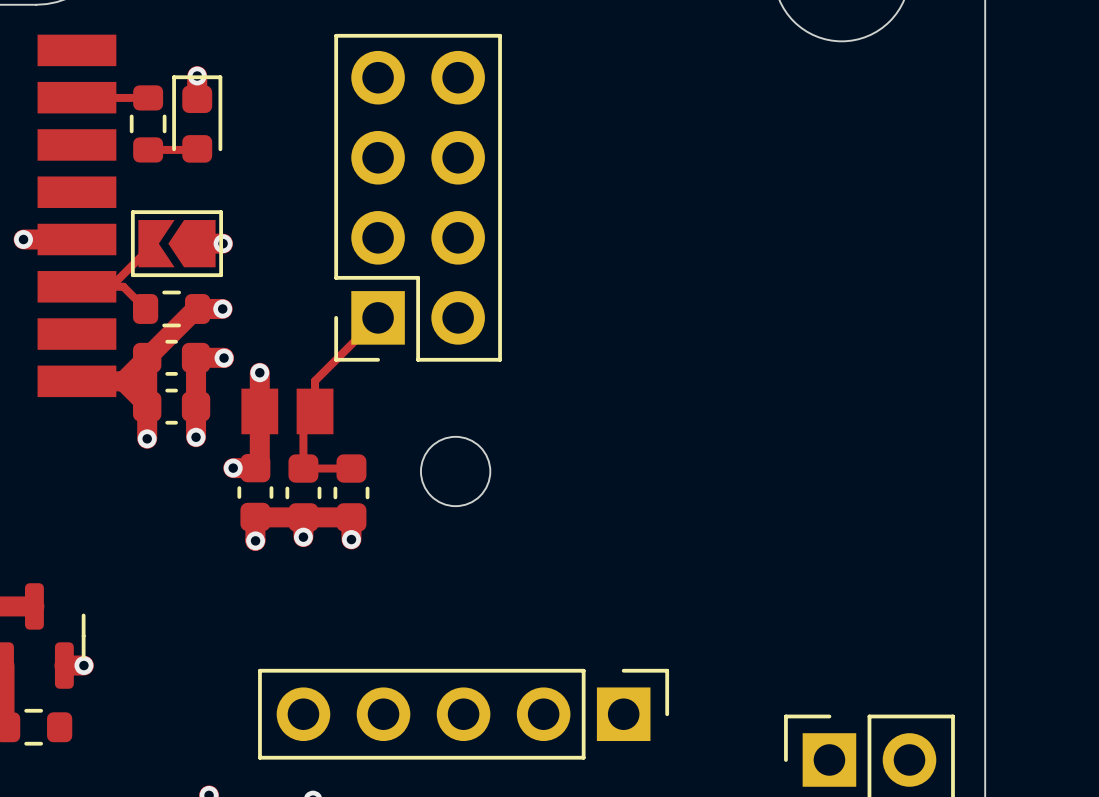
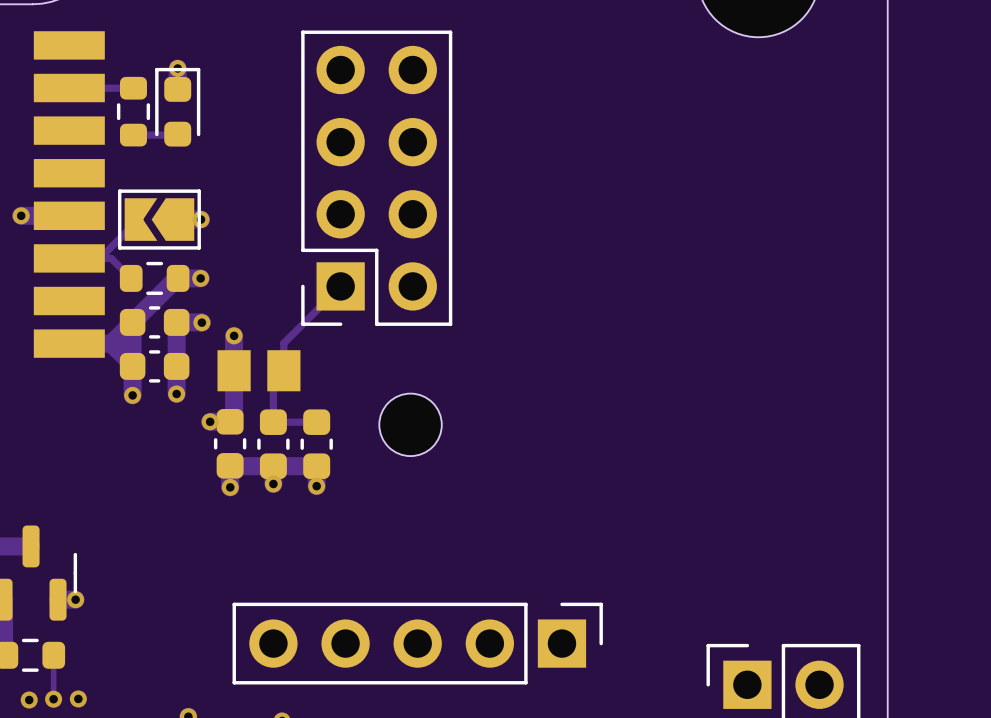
track: none -> (53, 655) (53, 699)
via: none -> (53, 699)
via: none -> (78, 698)
via: none -> (29, 700)

